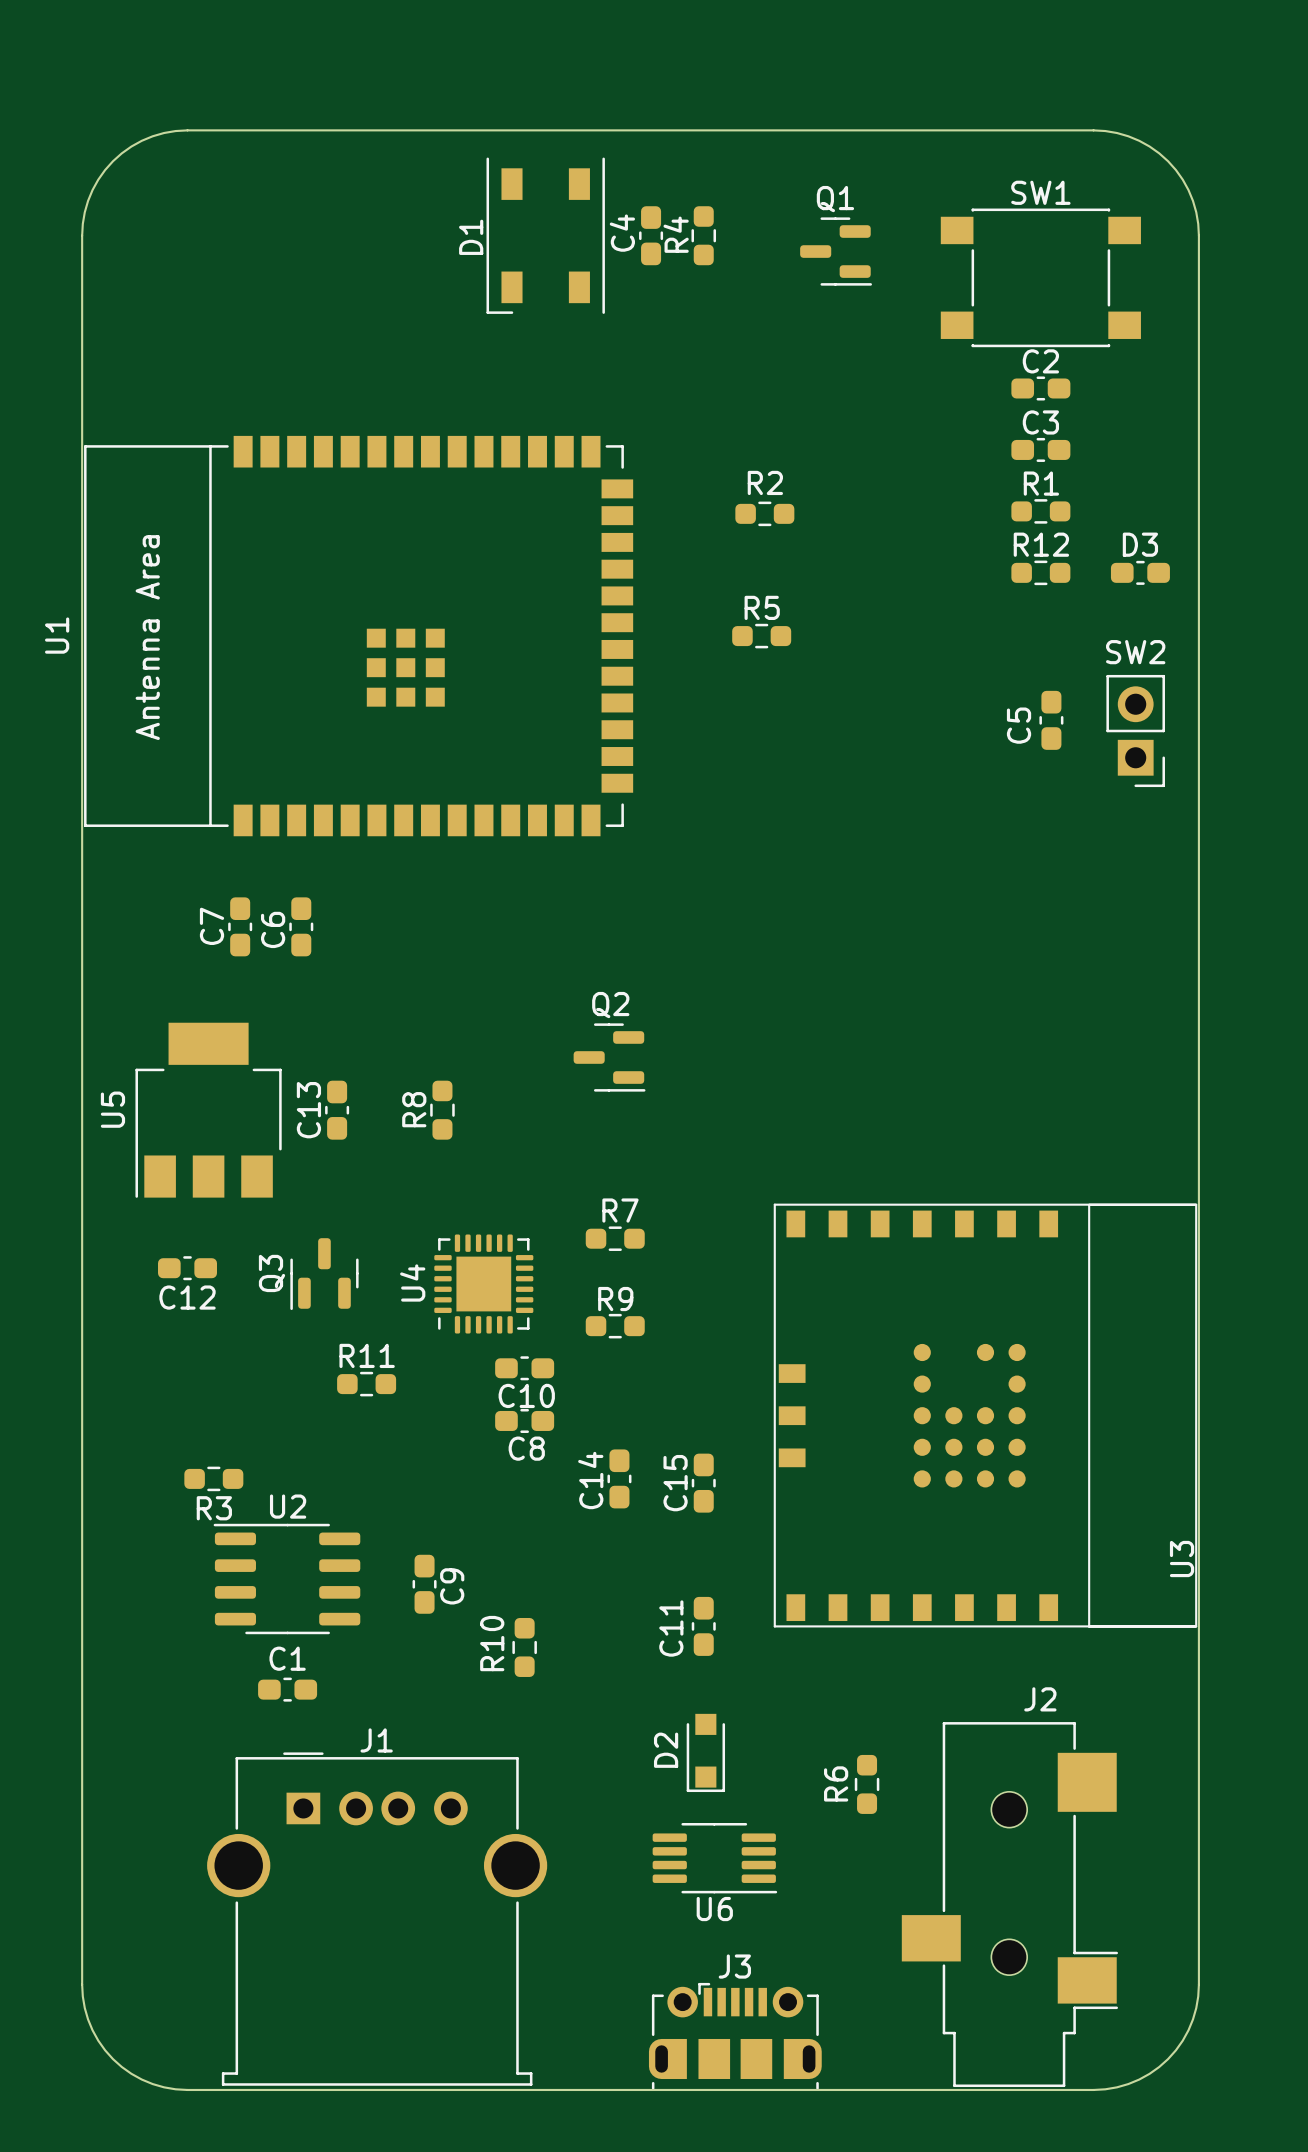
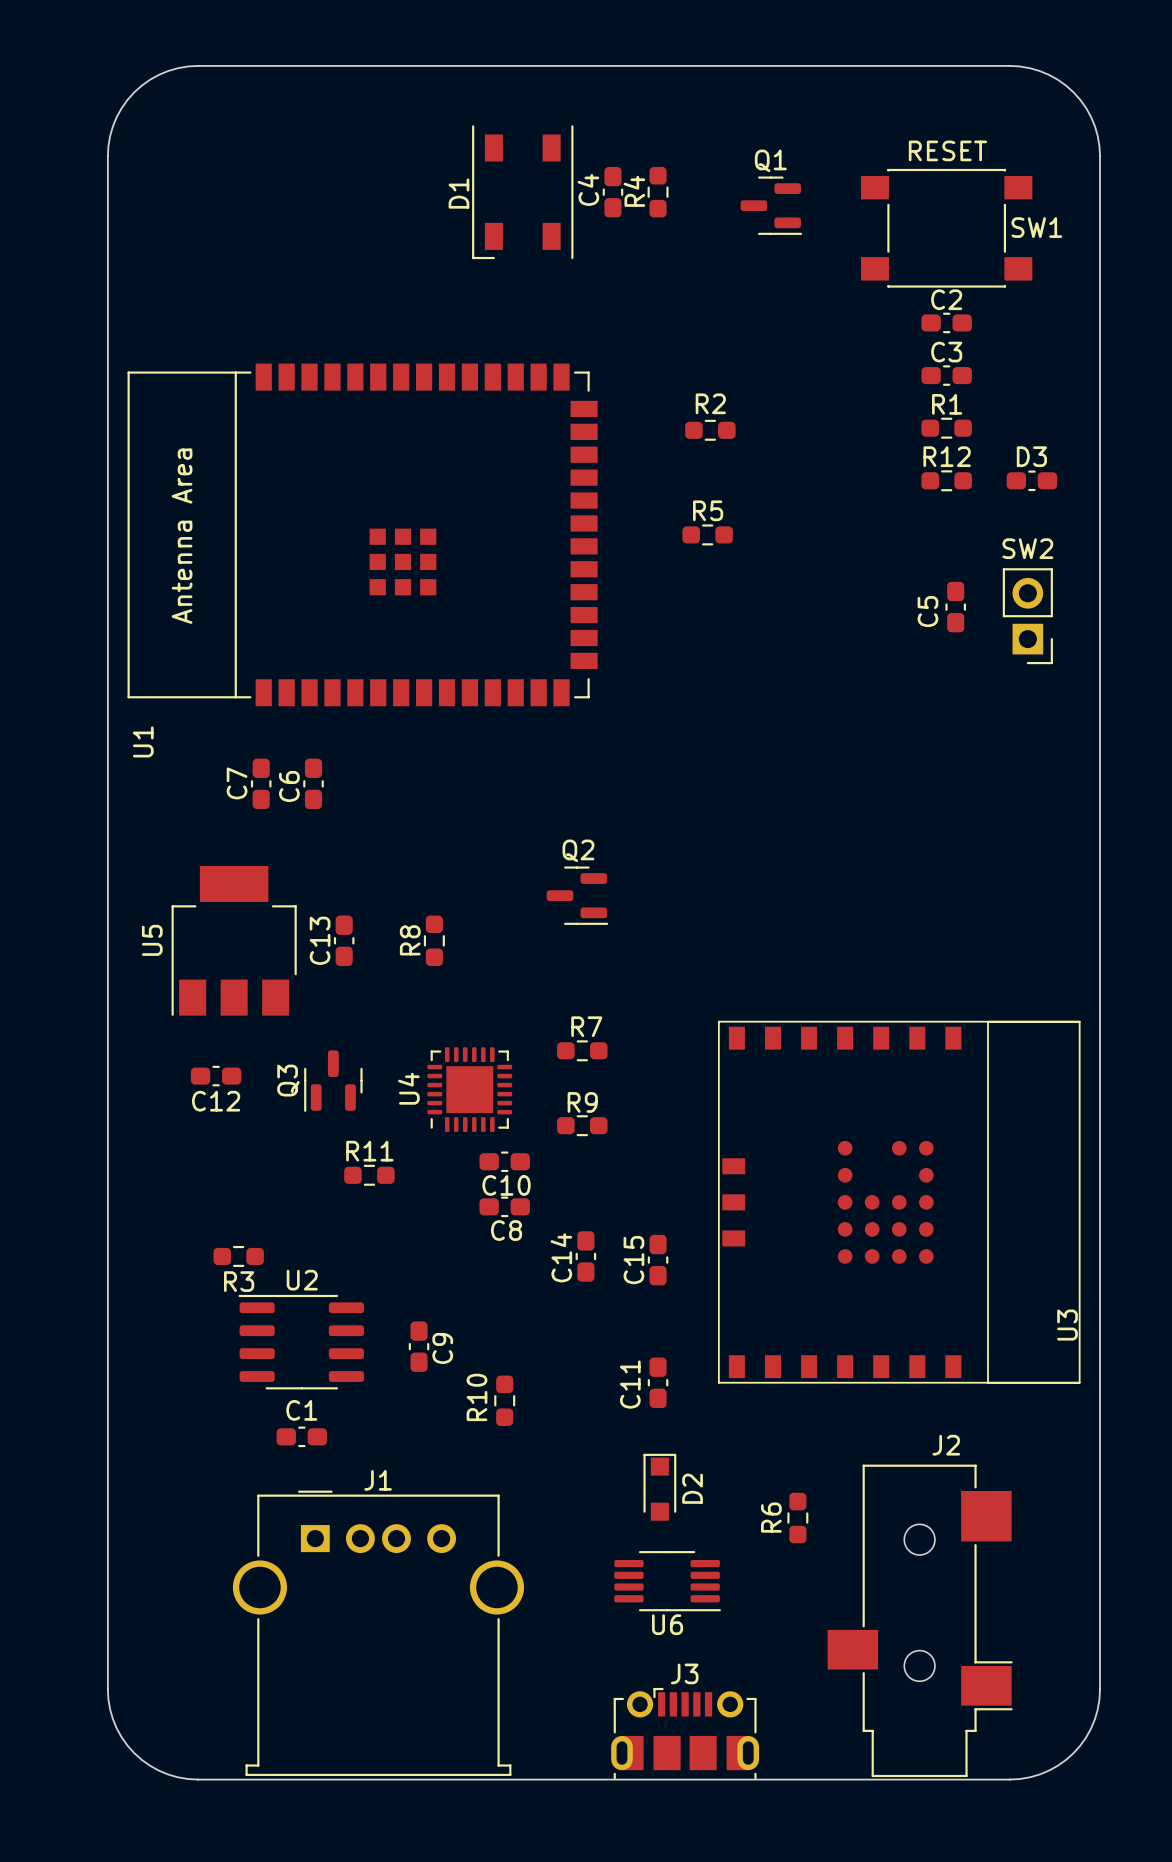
text: none -> RESET (947, 150)
SW1 name position: SW1 (1040, 192) -> SW1 (1036, 227)
U1 name position: U1 (57, 635) -> U1 (143, 741)
D2 rotation: 0° (705, 1752) -> 180° (659, 1487)
board edge: (187, 2089) (152, 2084) (131, 2073) (113, 2059) (98, 2040) (88, 2019) (82, 1984) (82, 223) (88, 200) (98, 179) (121, 153) (152, 136) (187, 130) (1105, 131) (1128, 136) (1159, 153) (1175, 170) (1188, 190) (1196, 212) (1198, 235) (1198, 1984) (1193, 2019) (1182, 2040) (1168, 2059) (1139, 2079) (1117, 2087) (1093, 2089) -> (216, 1779) (178, 1777) (158, 1770) (141, 1759) (127, 1745) (116, 1728) (110, 1709) (107, 1689) (107, 156) (112, 126) (121, 108) (134, 92) (150, 79) (168, 70) (198, 65) (1019, 66) (1039, 70) (1066, 85) (1080, 99) (1091, 116) (1097, 136) (1100, 156) (1099, 1699) (1094, 1719) (1086, 1737) (1066, 1759) (1048, 1770) (1029, 1777) (991, 1779)

